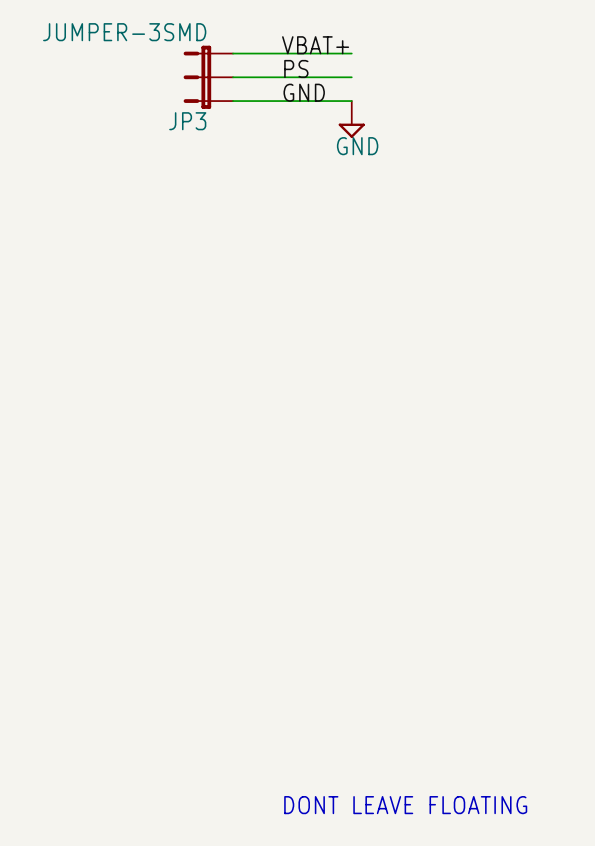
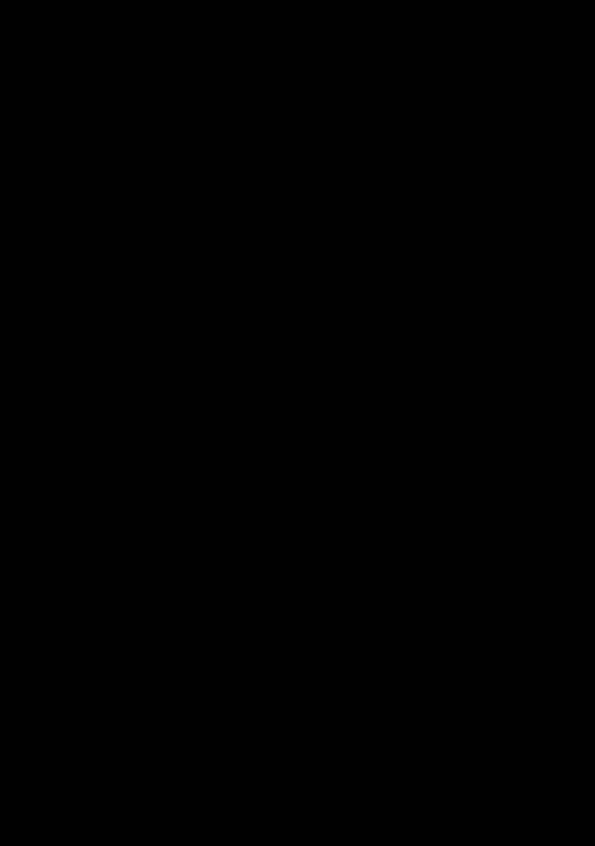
label: VBAT+ (315, 45) -> none
wire: (233, 53) (351, 53) -> none
label: PS (296, 68) -> none
JP3: JUMPER-3SMD (208, 77) -> none
wire: (233, 77) (351, 77) -> none
label: GND (304, 92) -> none
wire: (233, 101) (351, 101) -> none
power symbol: GND (351, 119) -> none
text: DONT LEAVE FLOATING (405, 805) -> none

